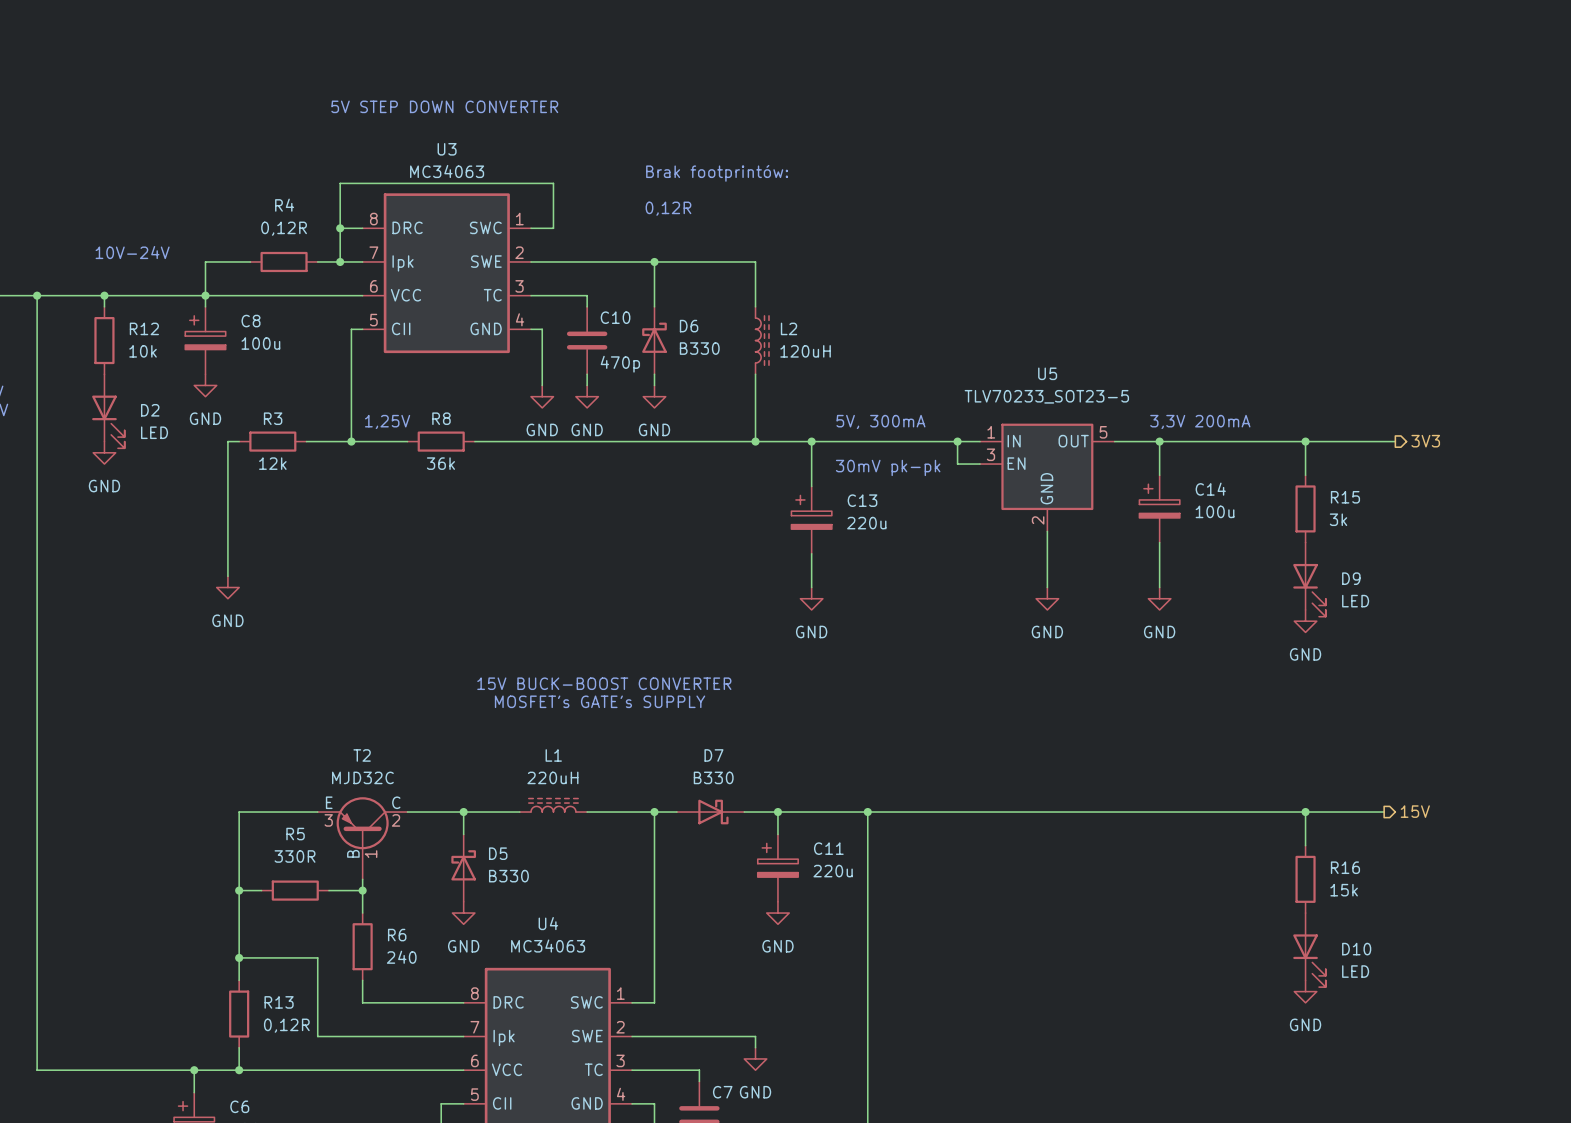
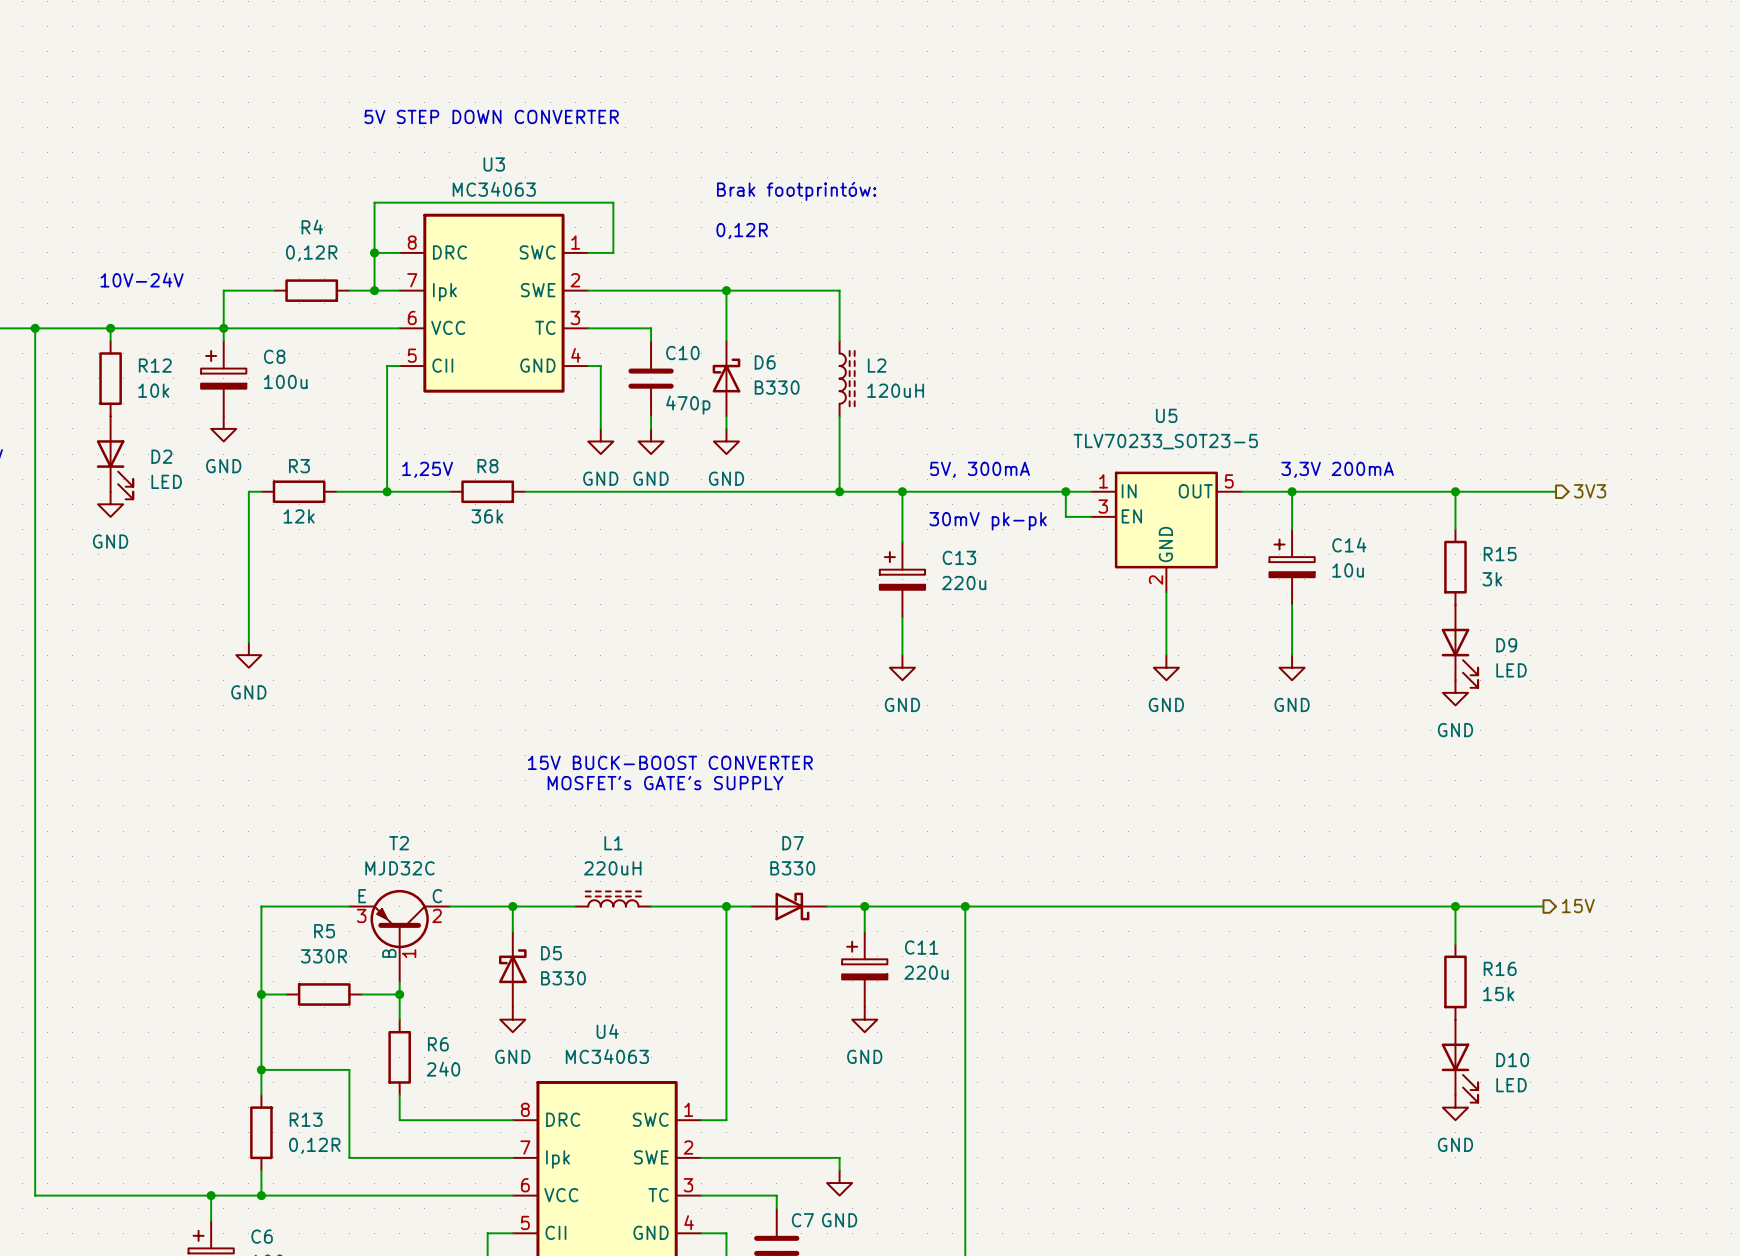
C14 value: 100u (1215, 511) -> 10u (1348, 570)

